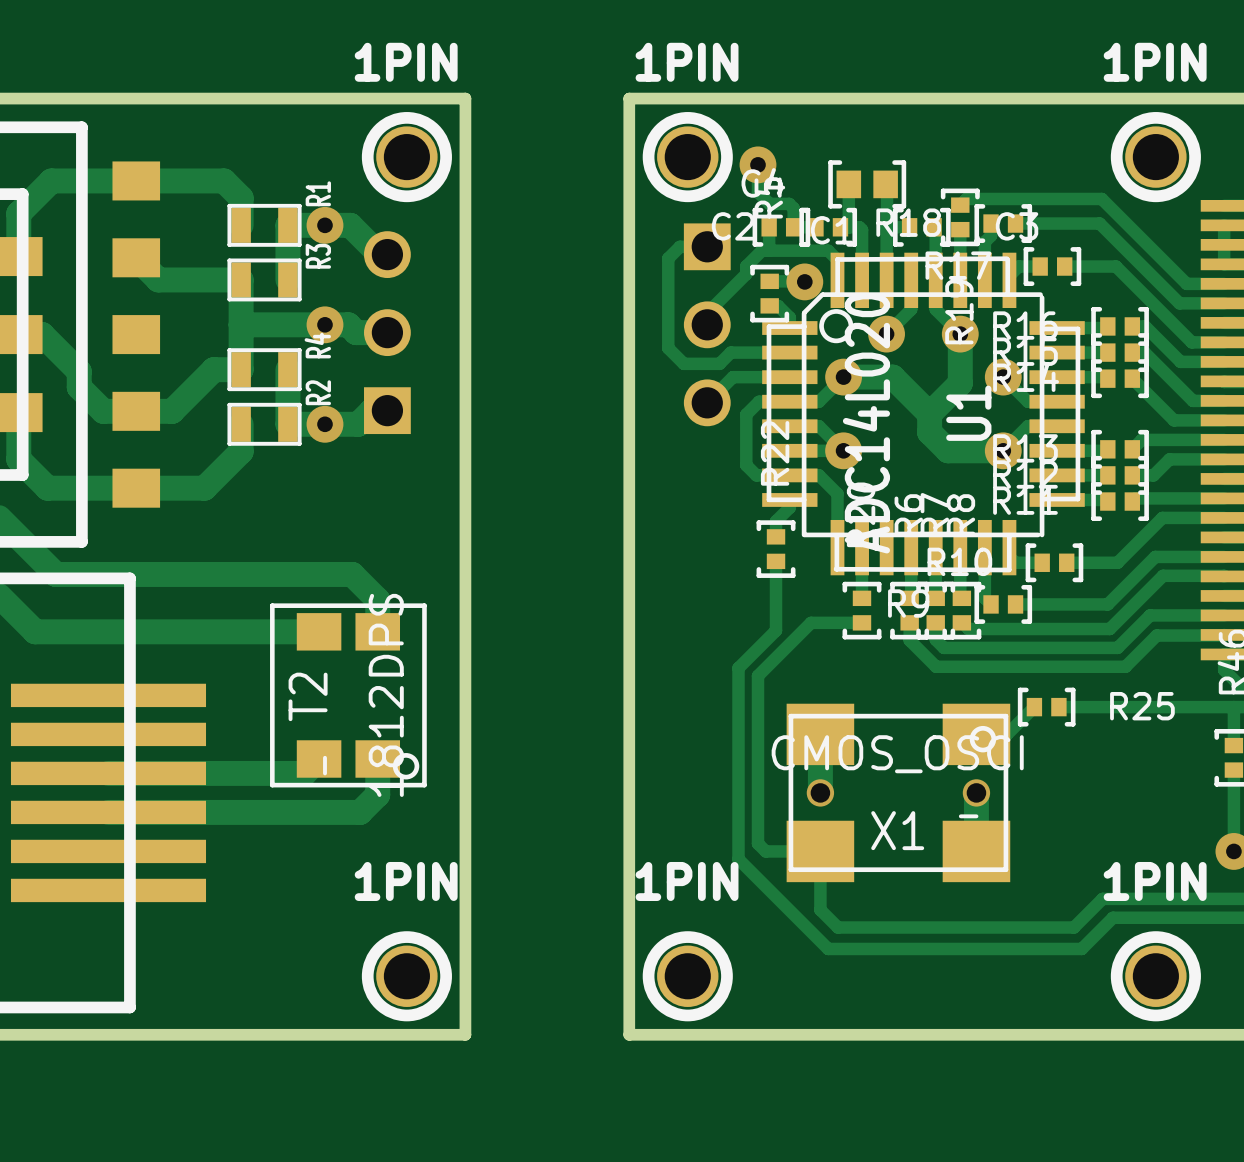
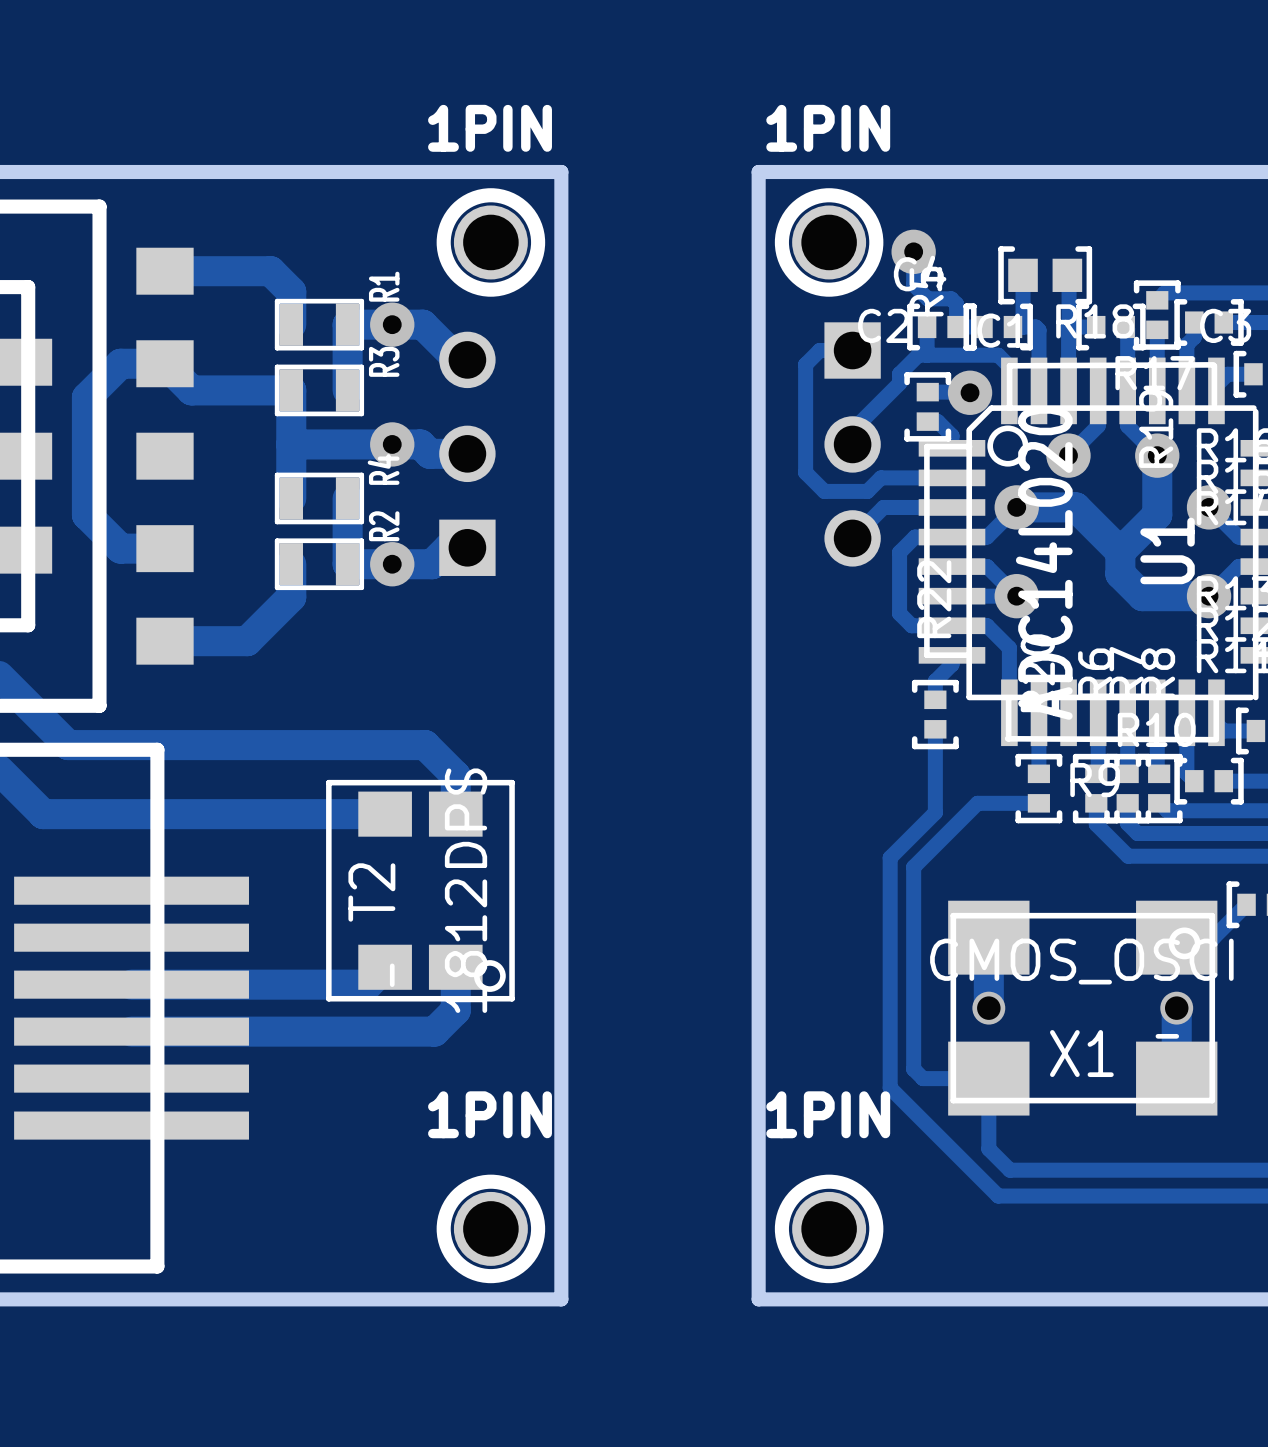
track: (136, 180) (51, 180) (18, 213) (18, 256) -> none
track: (18, 334) (42, 334) (79, 371) (79, 387) (103, 411) -> (164, 363) (120, 363) (86, 397) (86, 514) (120, 548) (125, 548)
track: (241, 369) (213, 369) (172, 411) (136, 411) -> none
track: (18, 412) (18, 459) (47, 488) (136, 488) -> none

